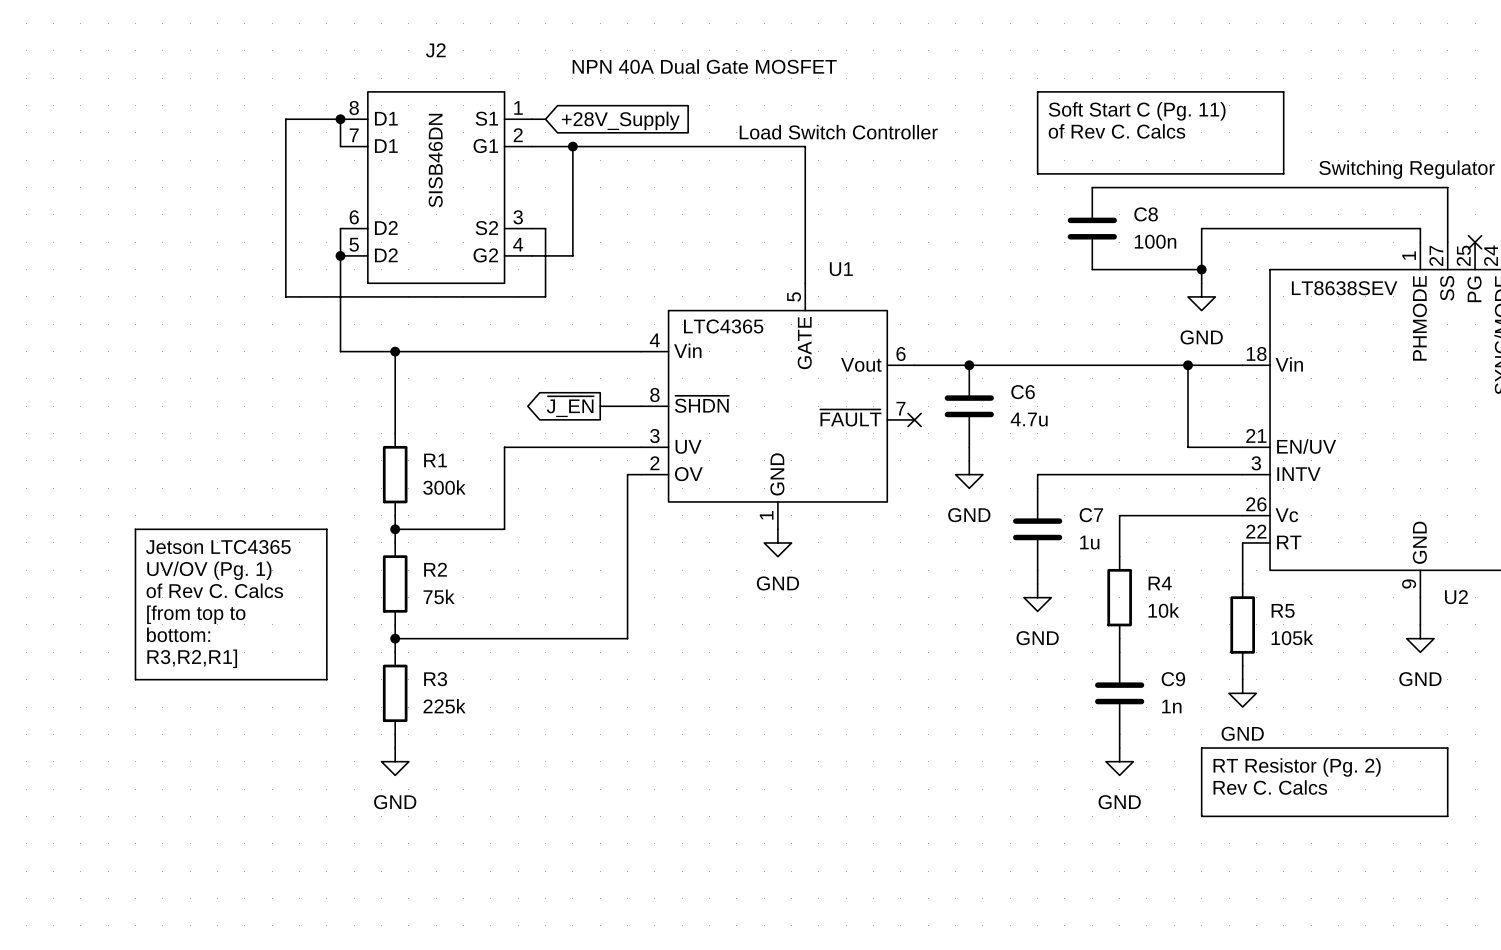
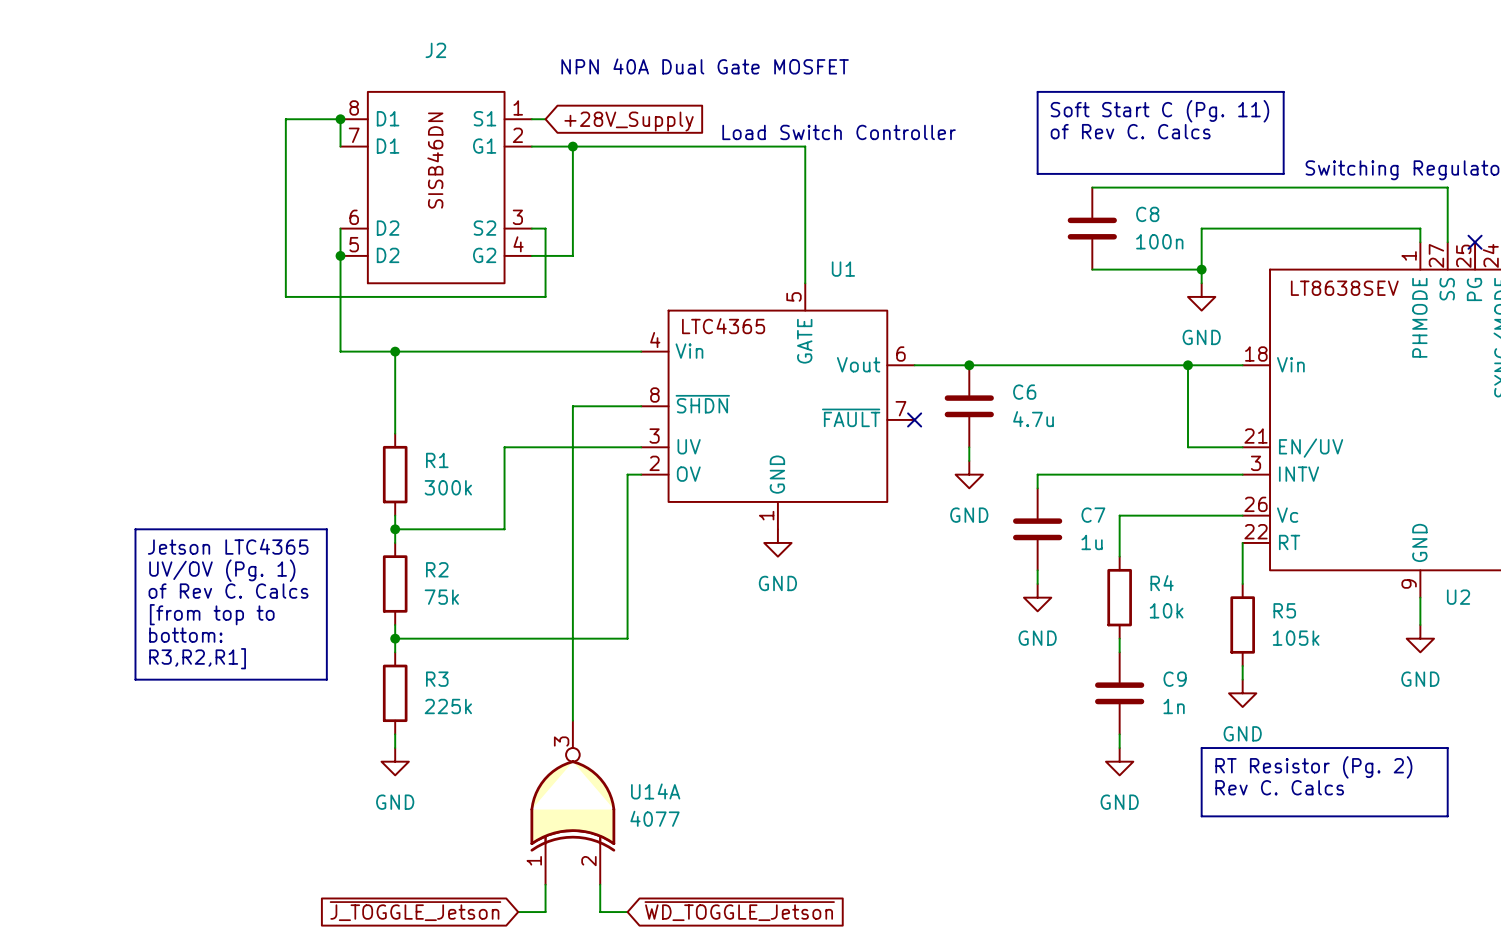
global label: ~{J_EN} (570, 406) -> none
wire: none -> (600, 406) (572, 406) (572, 720)
U14A: none -> 4077 (572, 802)
wire: none -> (545, 884) (545, 912) (518, 912)
wire: none -> (600, 884) (600, 912) (627, 912)
global label: none -> ~{J_TOGGLE_Jetson} (415, 911)
global label: none -> ~{WD_TOGGLE_Jetson} (739, 911)

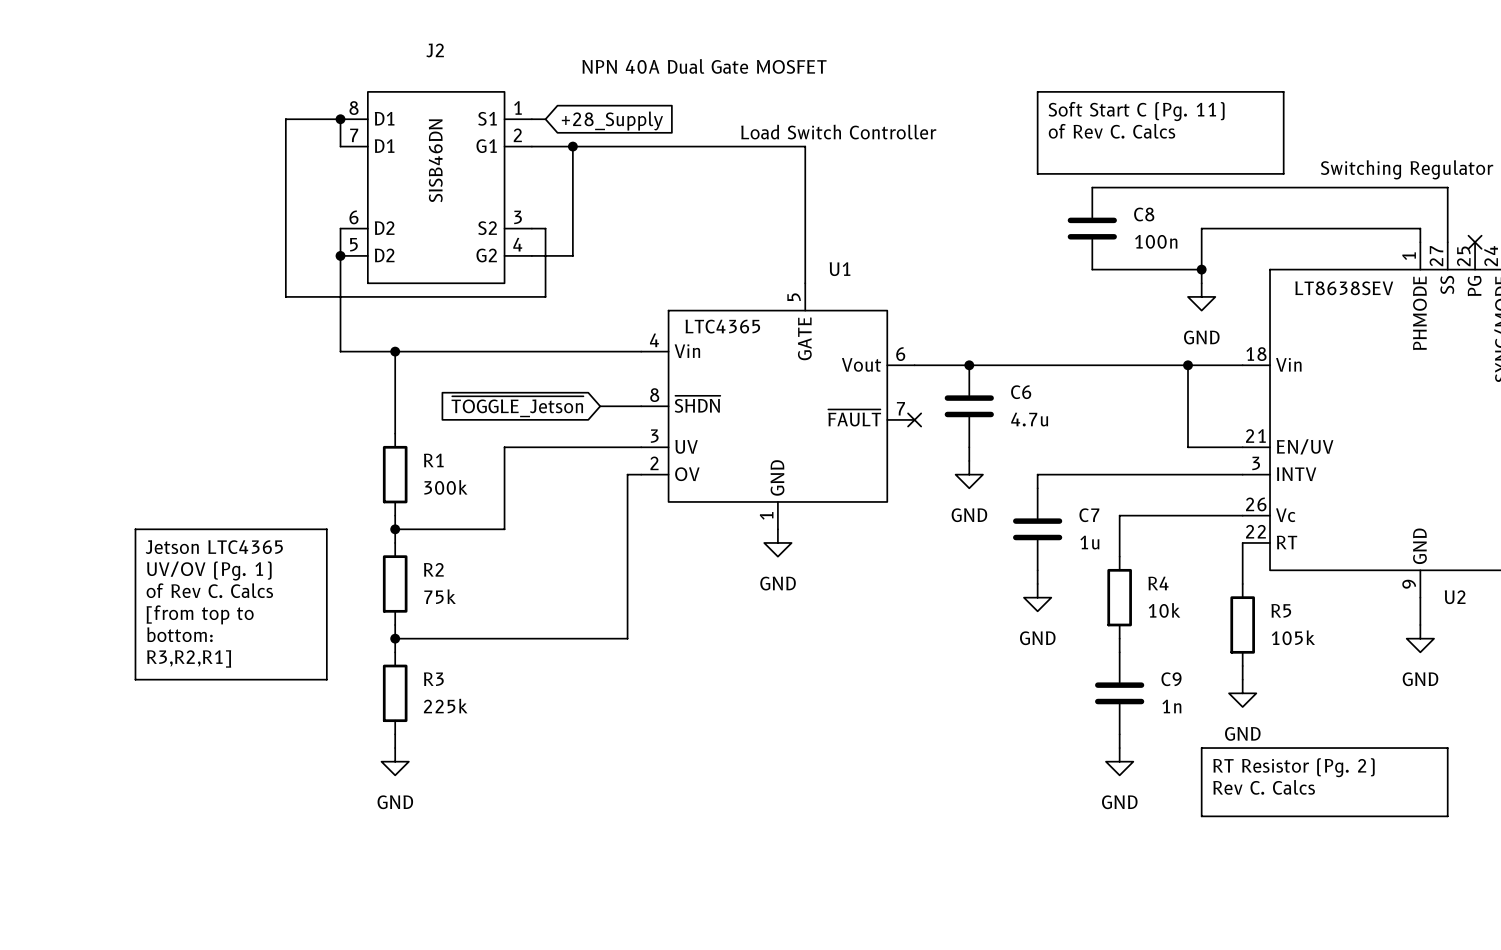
global label: +28V_Supply (629, 121) -> +28_Supply (612, 121)
global label: none -> ~{TOGGLE_Jetson} (517, 406)
wire: (600, 406) (572, 406) (572, 720) -> none
U14A: 4077 (572, 802) -> none
wire: (545, 884) (545, 912) (518, 912) -> none
wire: (600, 884) (600, 912) (627, 912) -> none
global label: ~{J_TOGGLE_Jetson} (415, 911) -> none
global label: ~{WD_TOGGLE_Jetson} (739, 911) -> none

